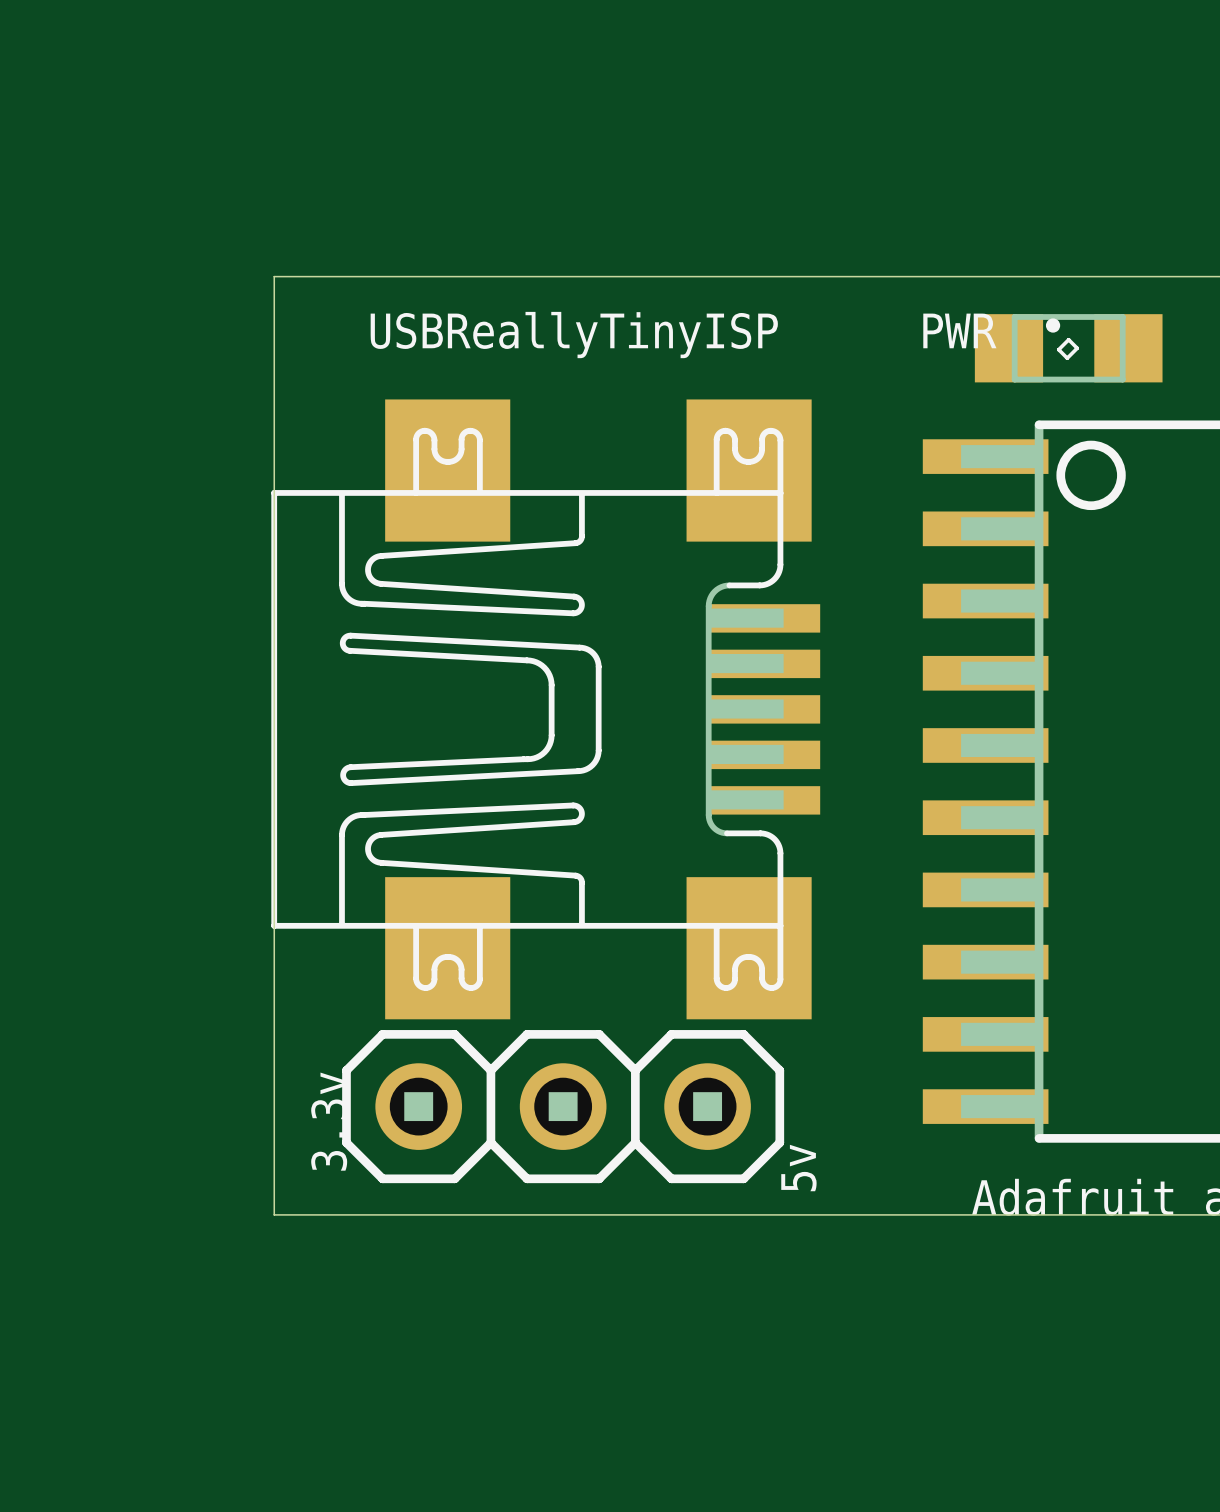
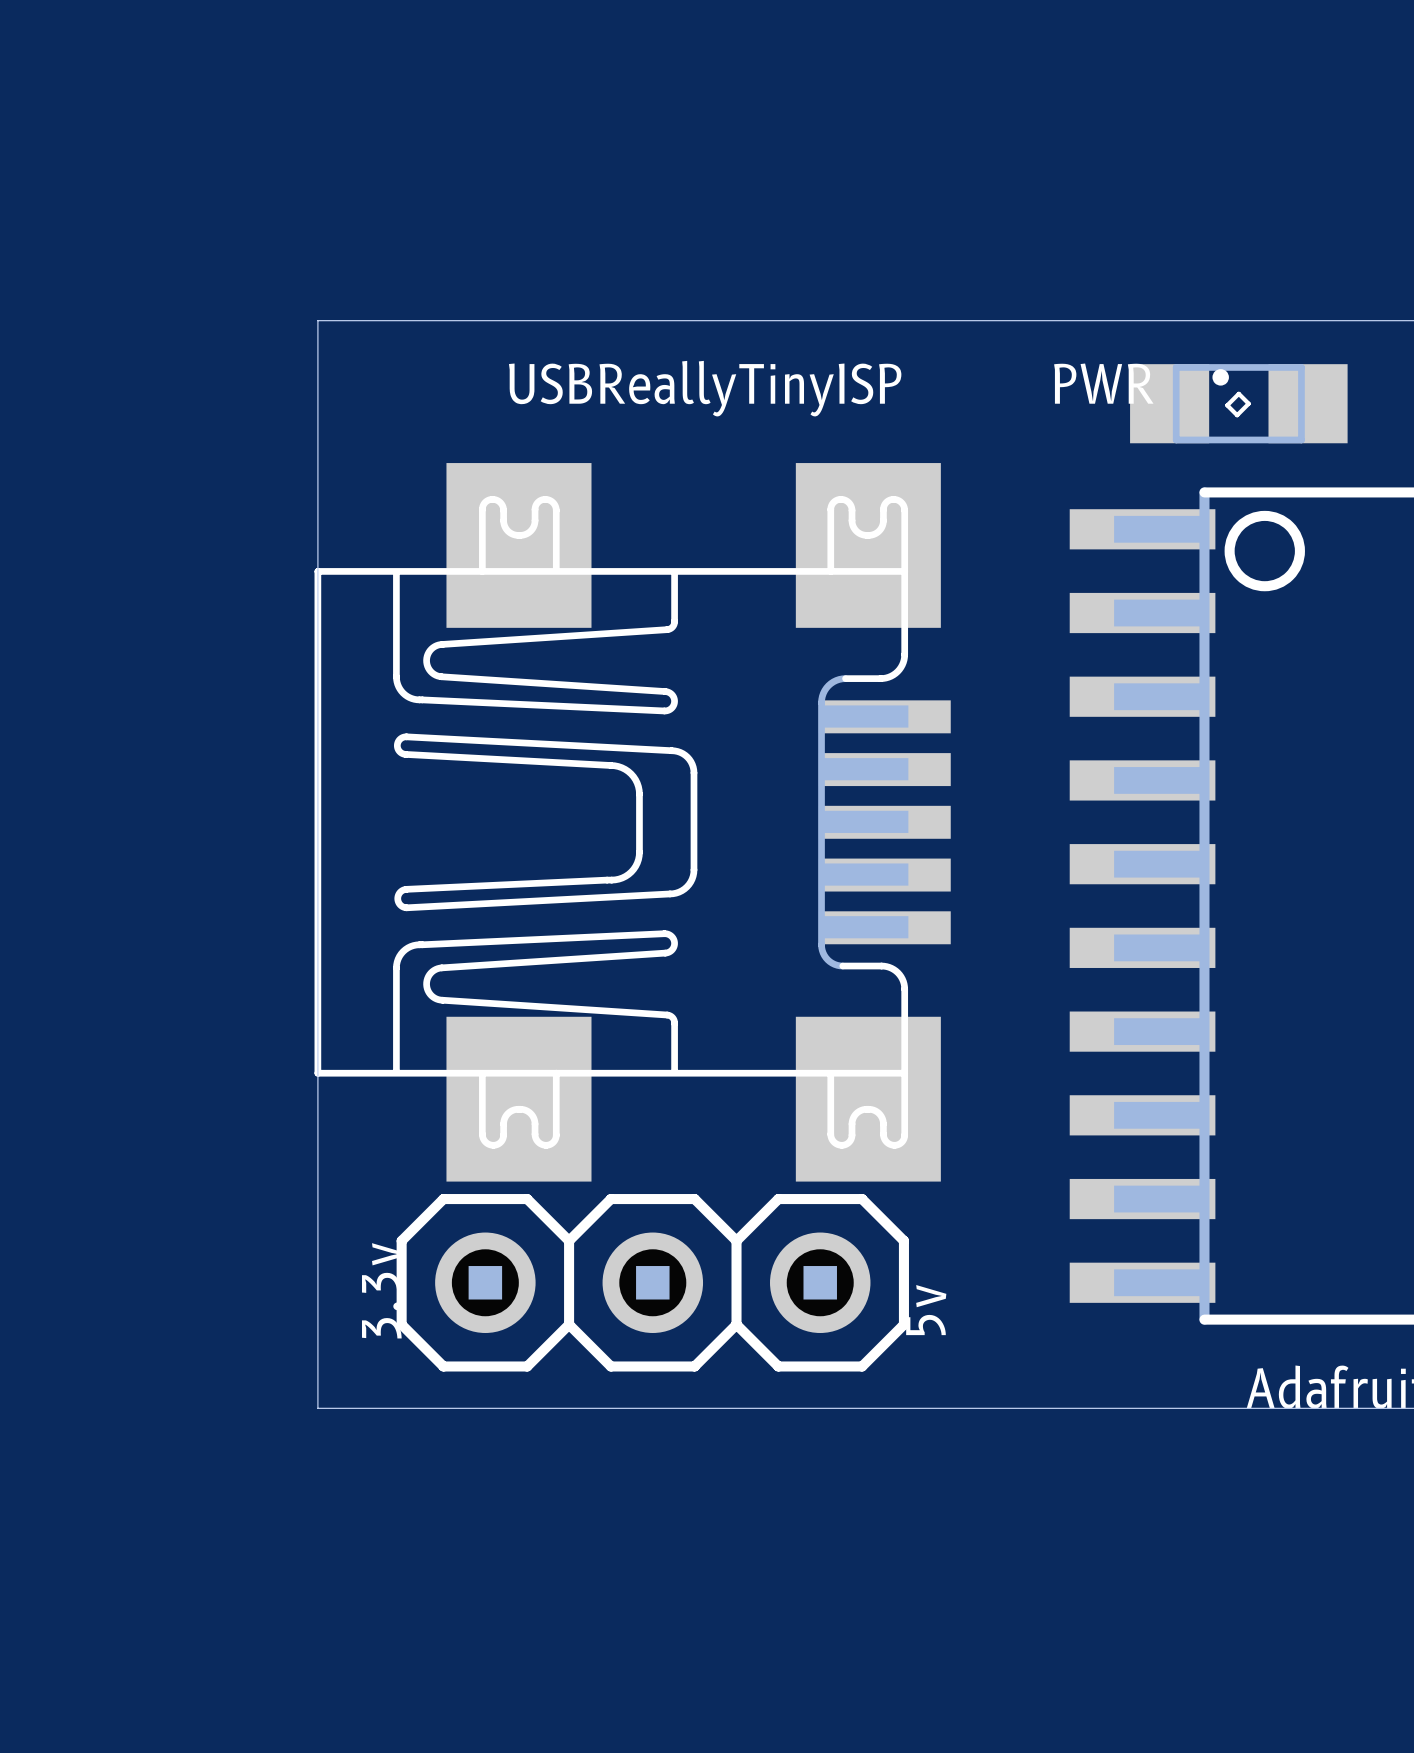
text position: 5v (798, 1168) -> 5v (926, 1310)

